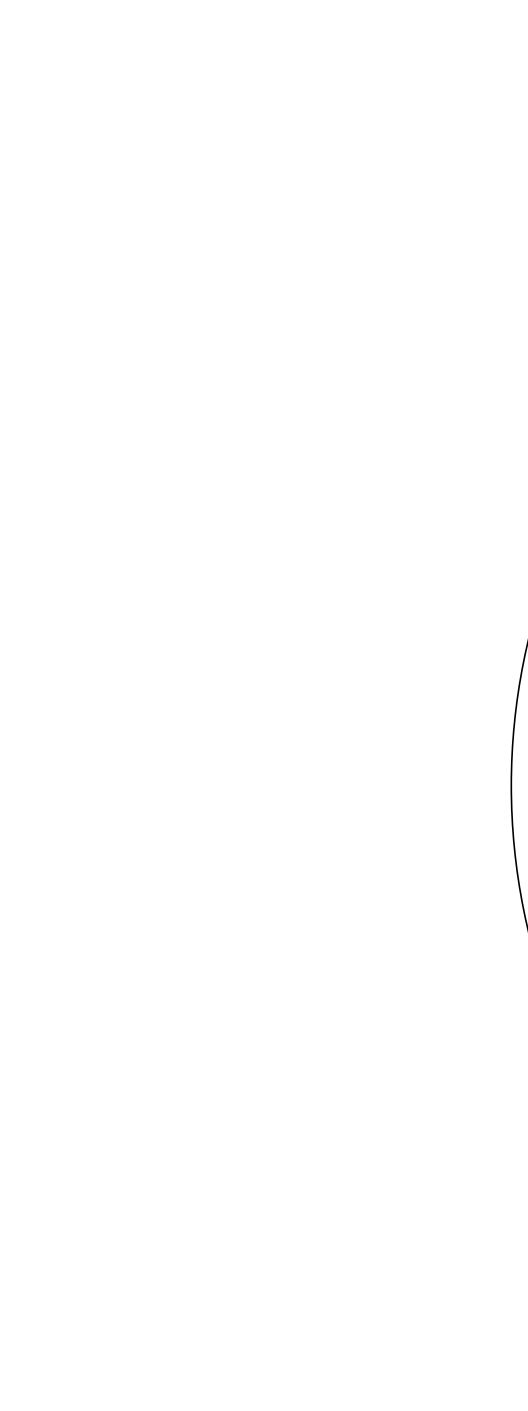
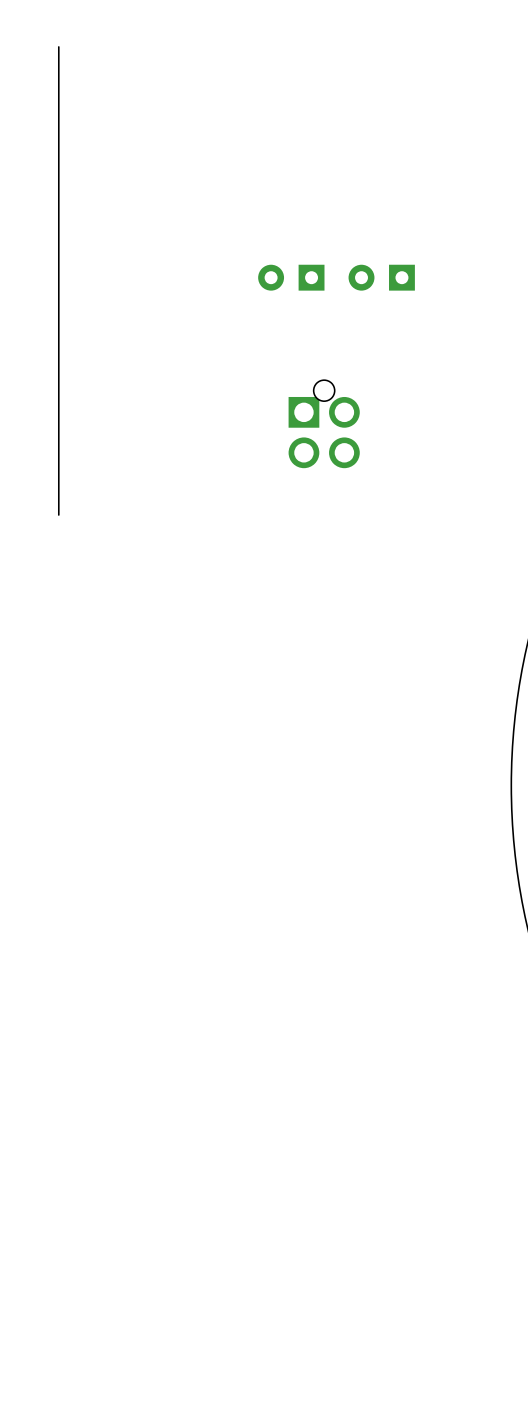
board edge: none -> (58, 46) (58, 515)
part: none -> (291, 277)
part: none -> (381, 277)
part: none -> (324, 424)

